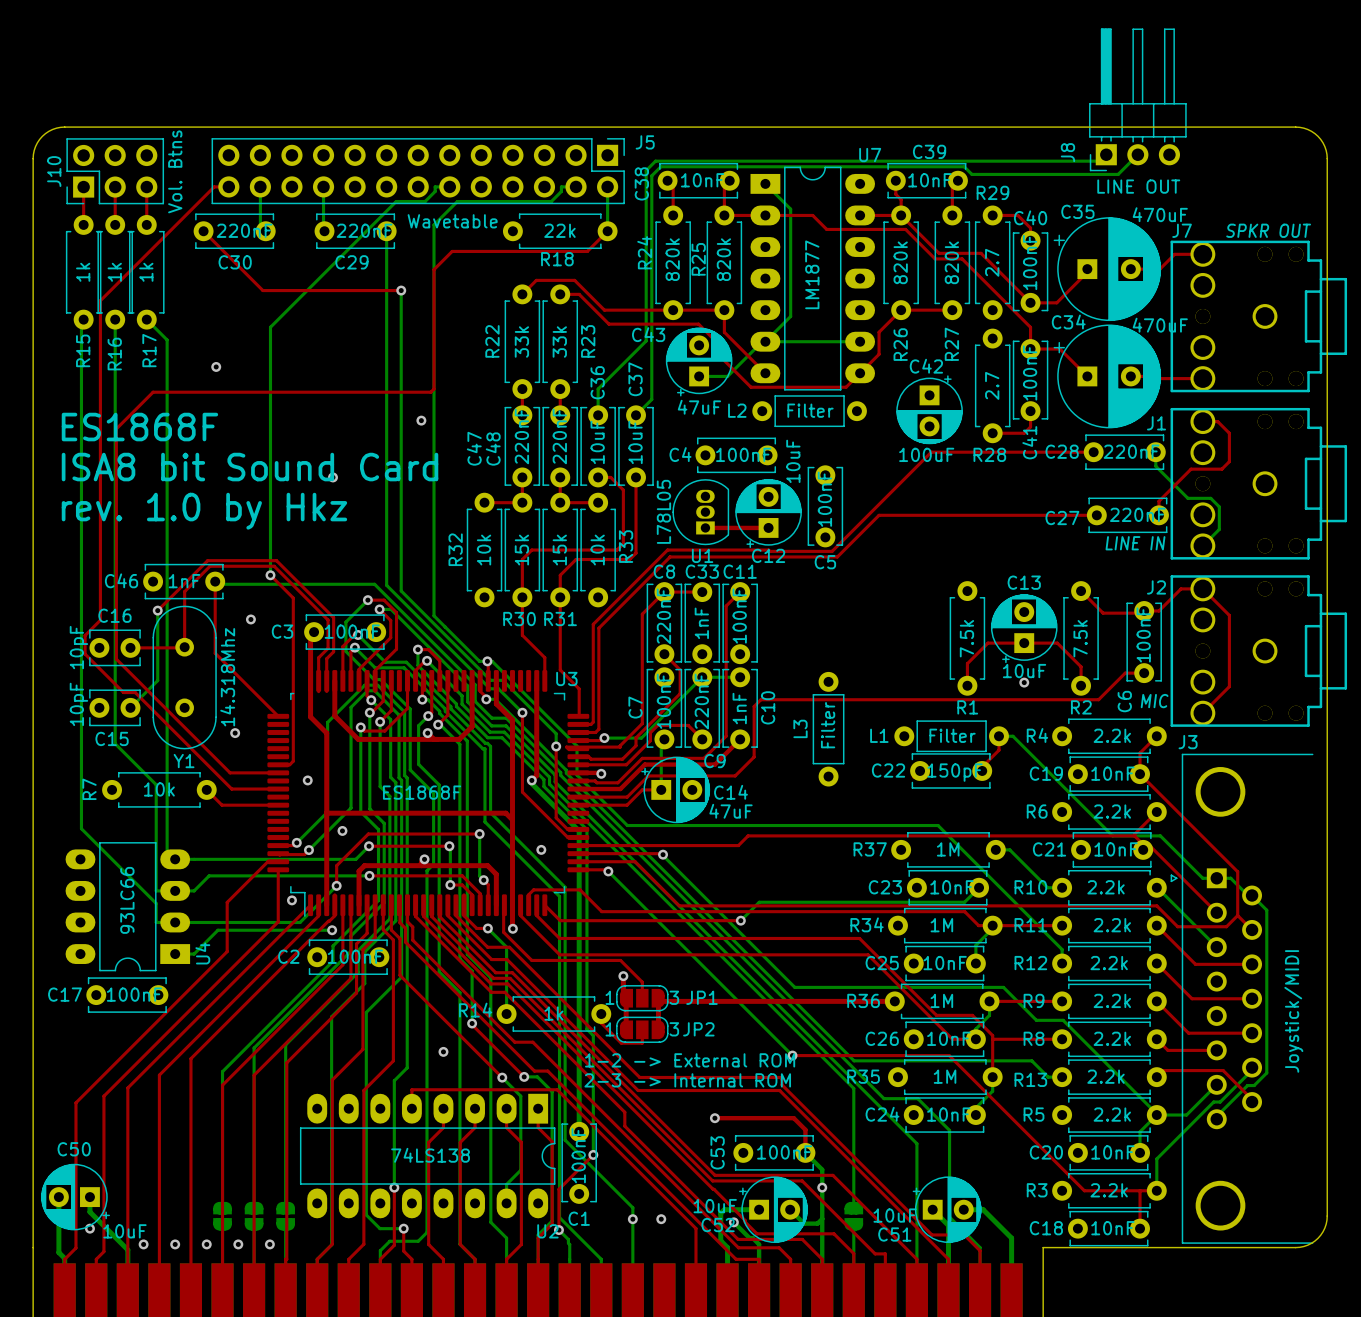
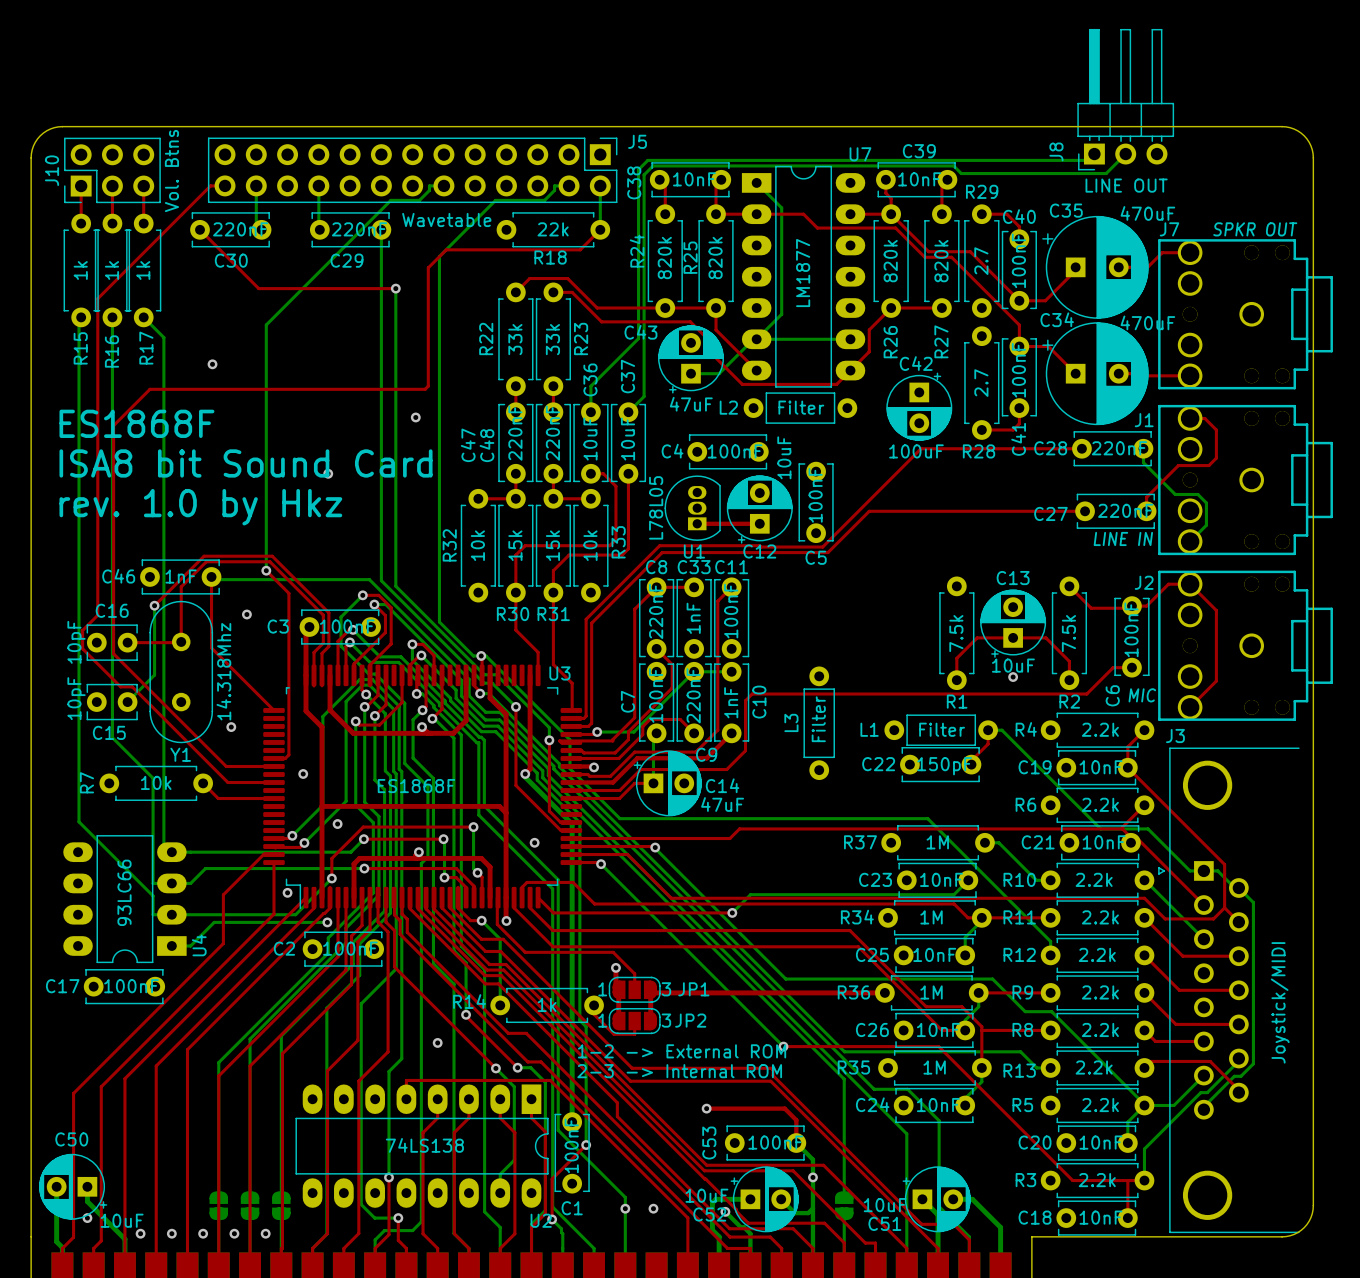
bottom track: (501, 201) (457, 201) (434, 224) (434, 615) (445, 627) -> (495, 200) (439, 256) (439, 622)

